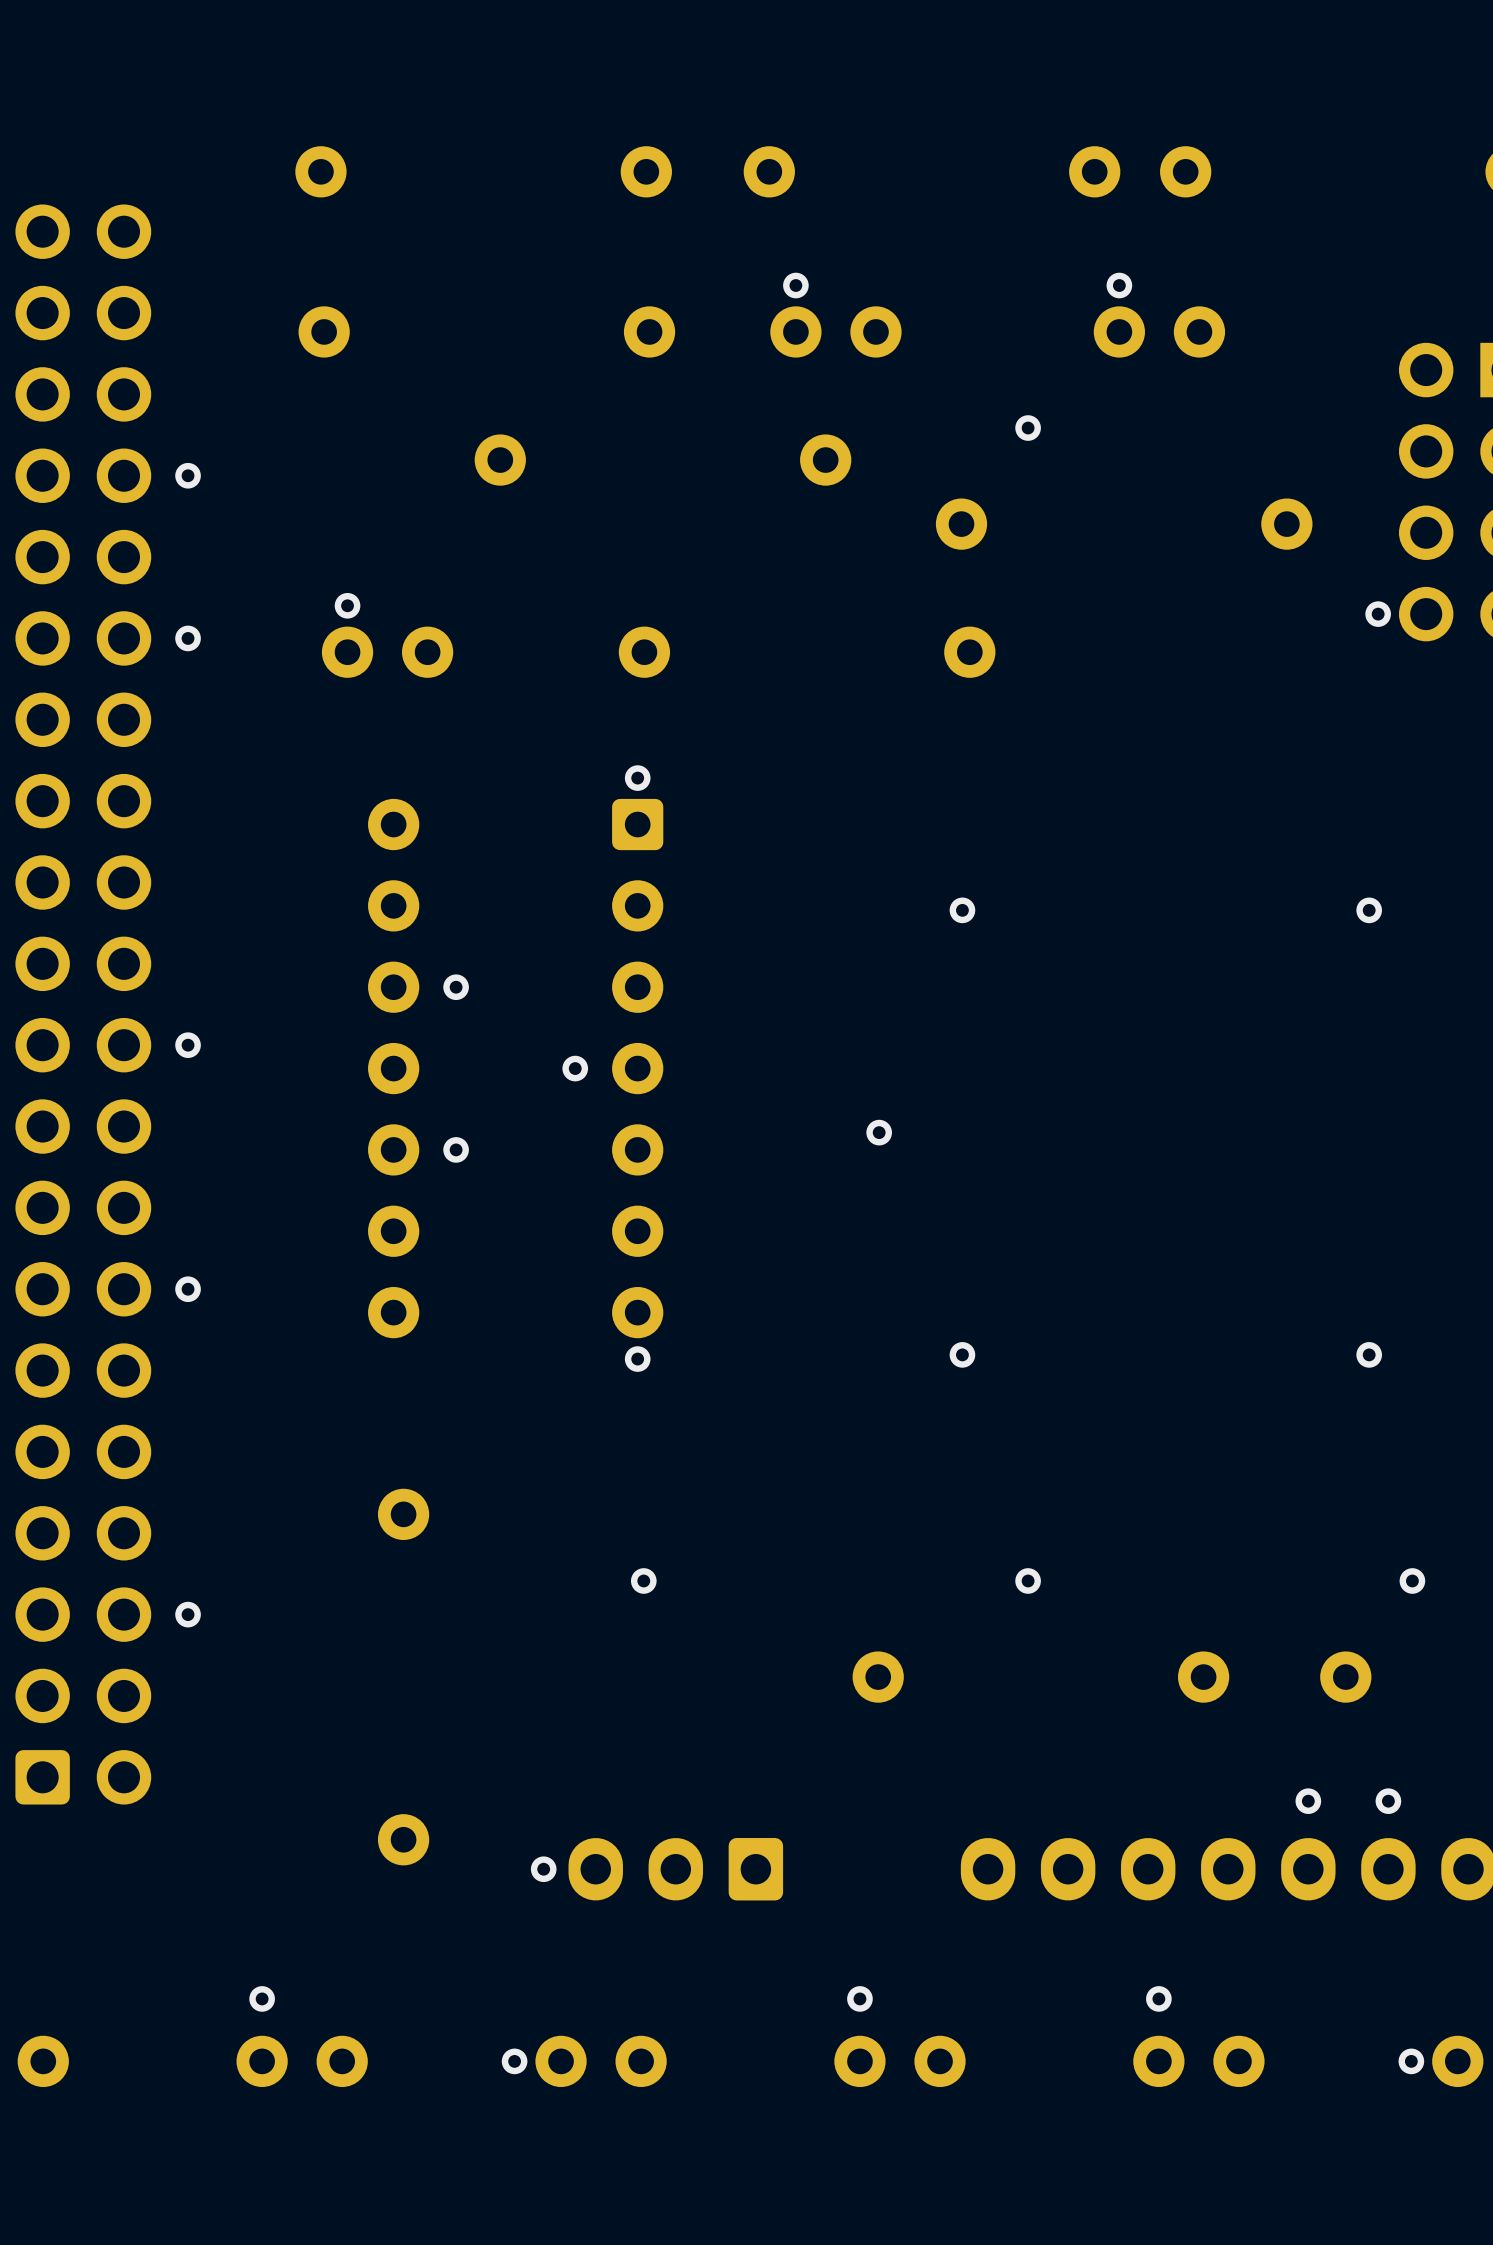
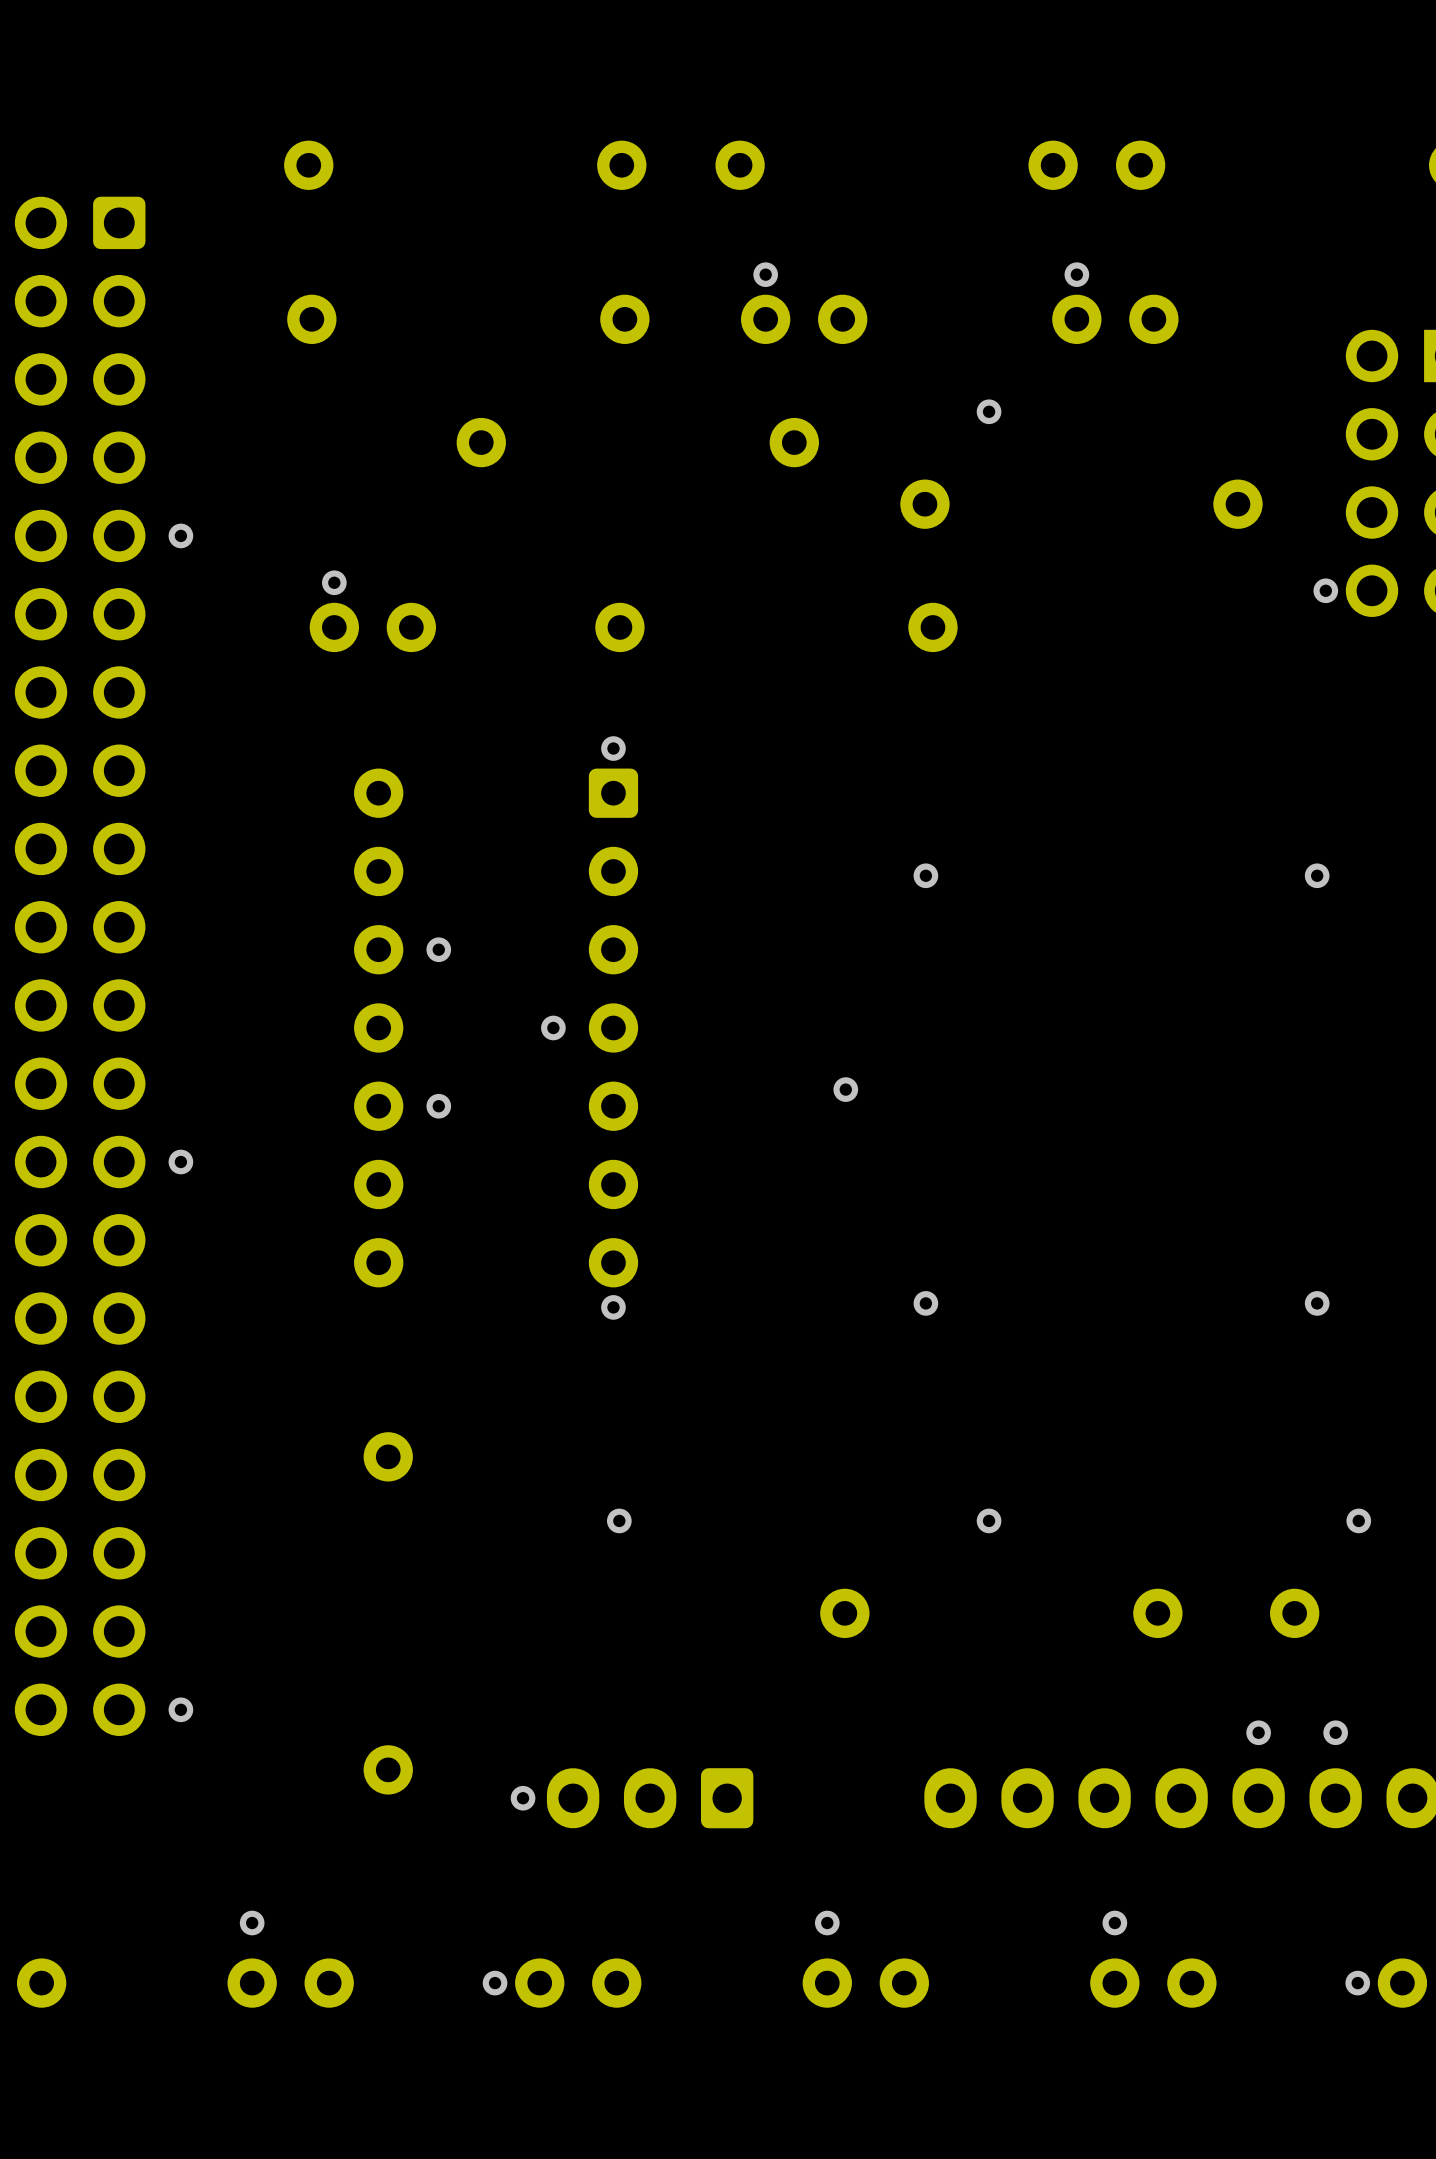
via: (188, 475) -> none
via: none -> (180, 535)
via: (188, 638) -> none
part rotation: 0° (83, 1004) -> 180° (80, 966)
via: (188, 1045) -> none
via: none -> (180, 1161)
via: (188, 1289) -> none
via: (188, 1614) -> none
via: none -> (180, 1709)

